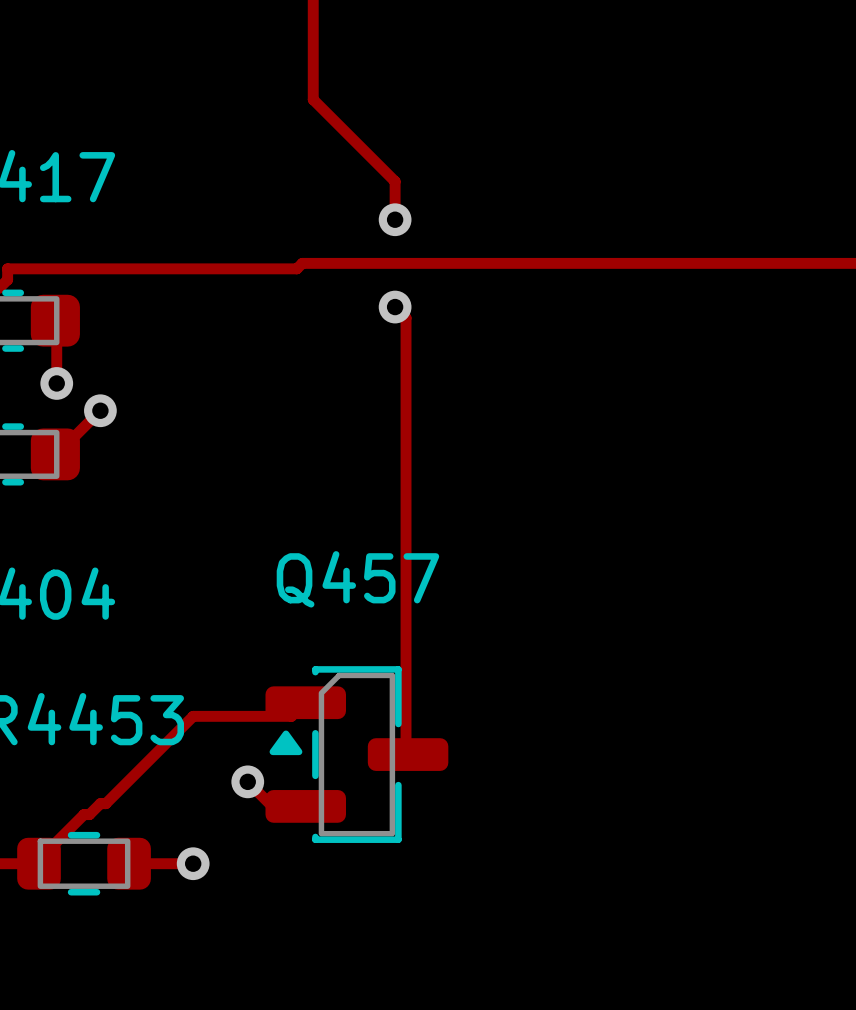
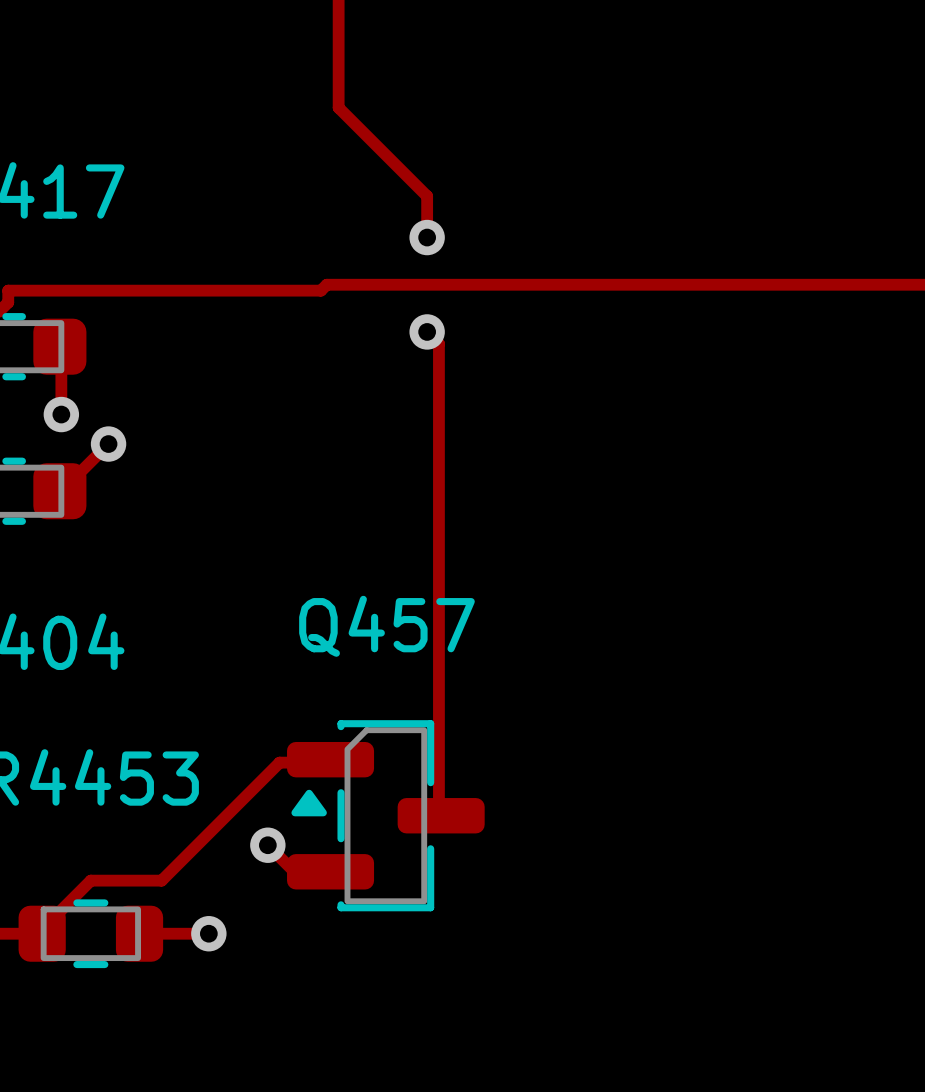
track: (302, 705) (291, 716) (193, 716) (105, 803) (100, 803) (89, 814) -> (326, 762) (279, 762) (161, 880) (96, 880)

